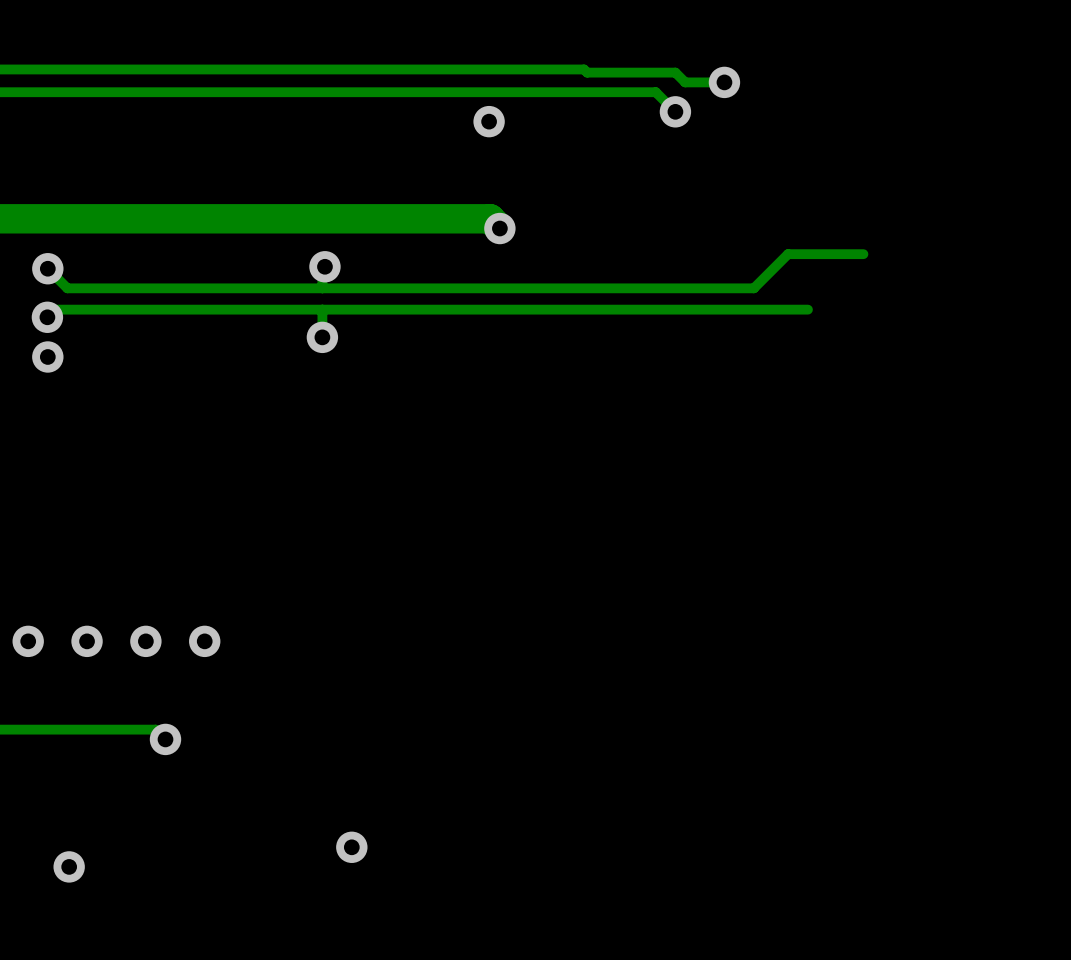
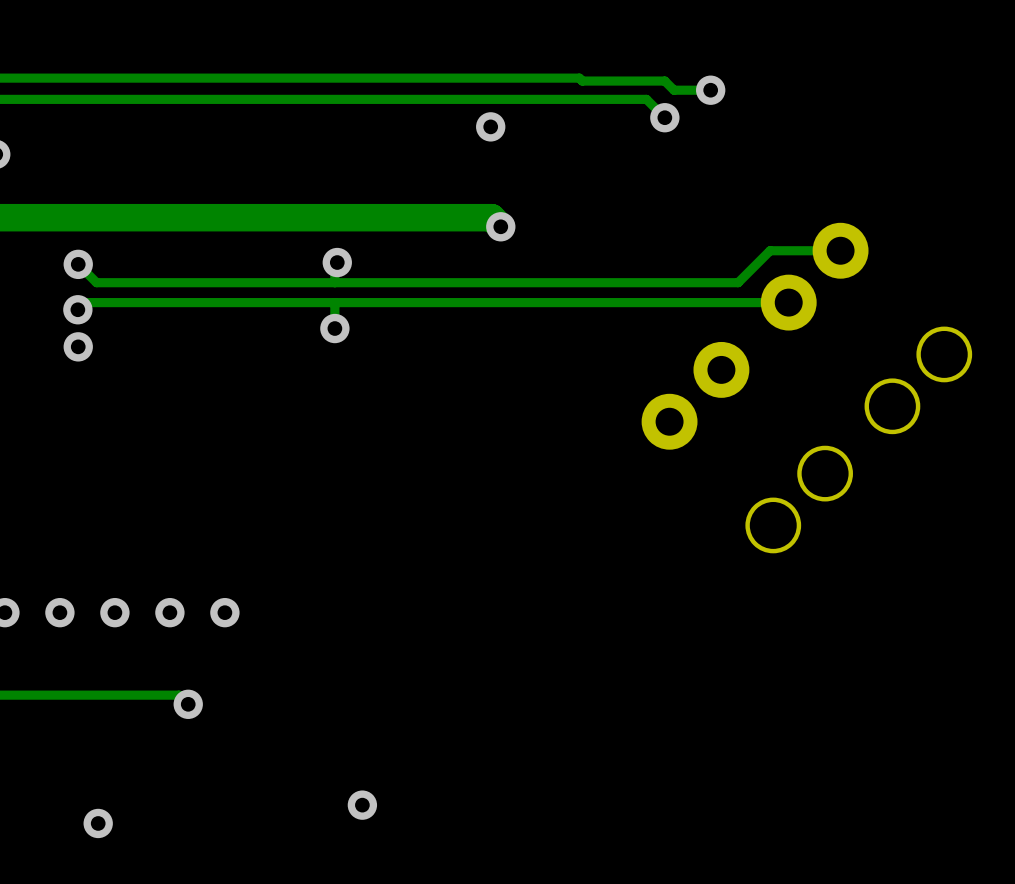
part: none -> (866, 328)
part: none -> (747, 447)

